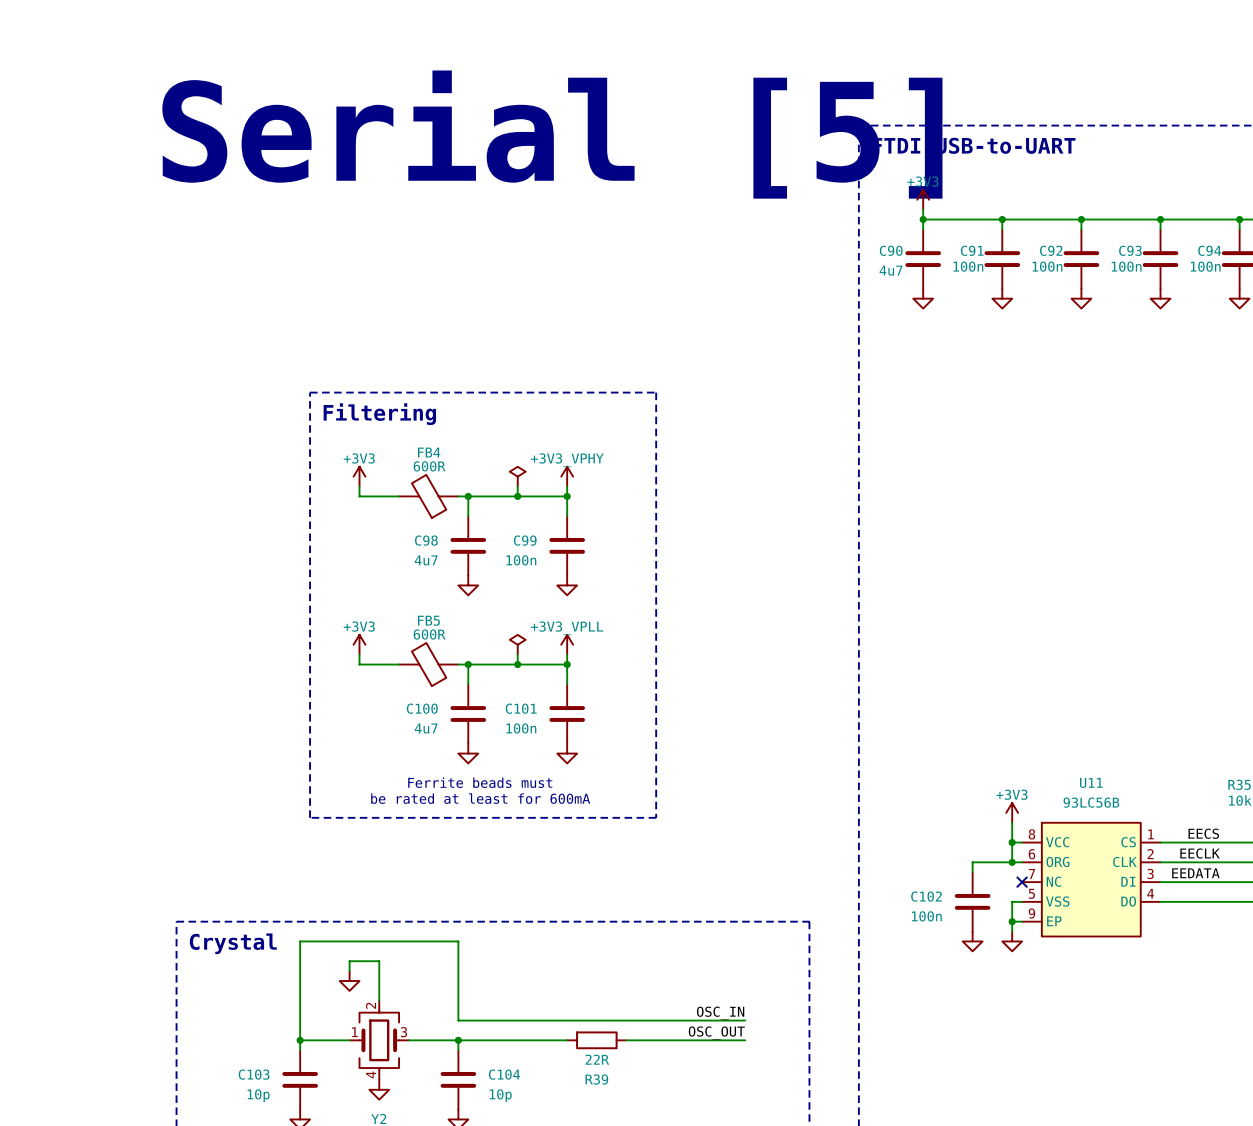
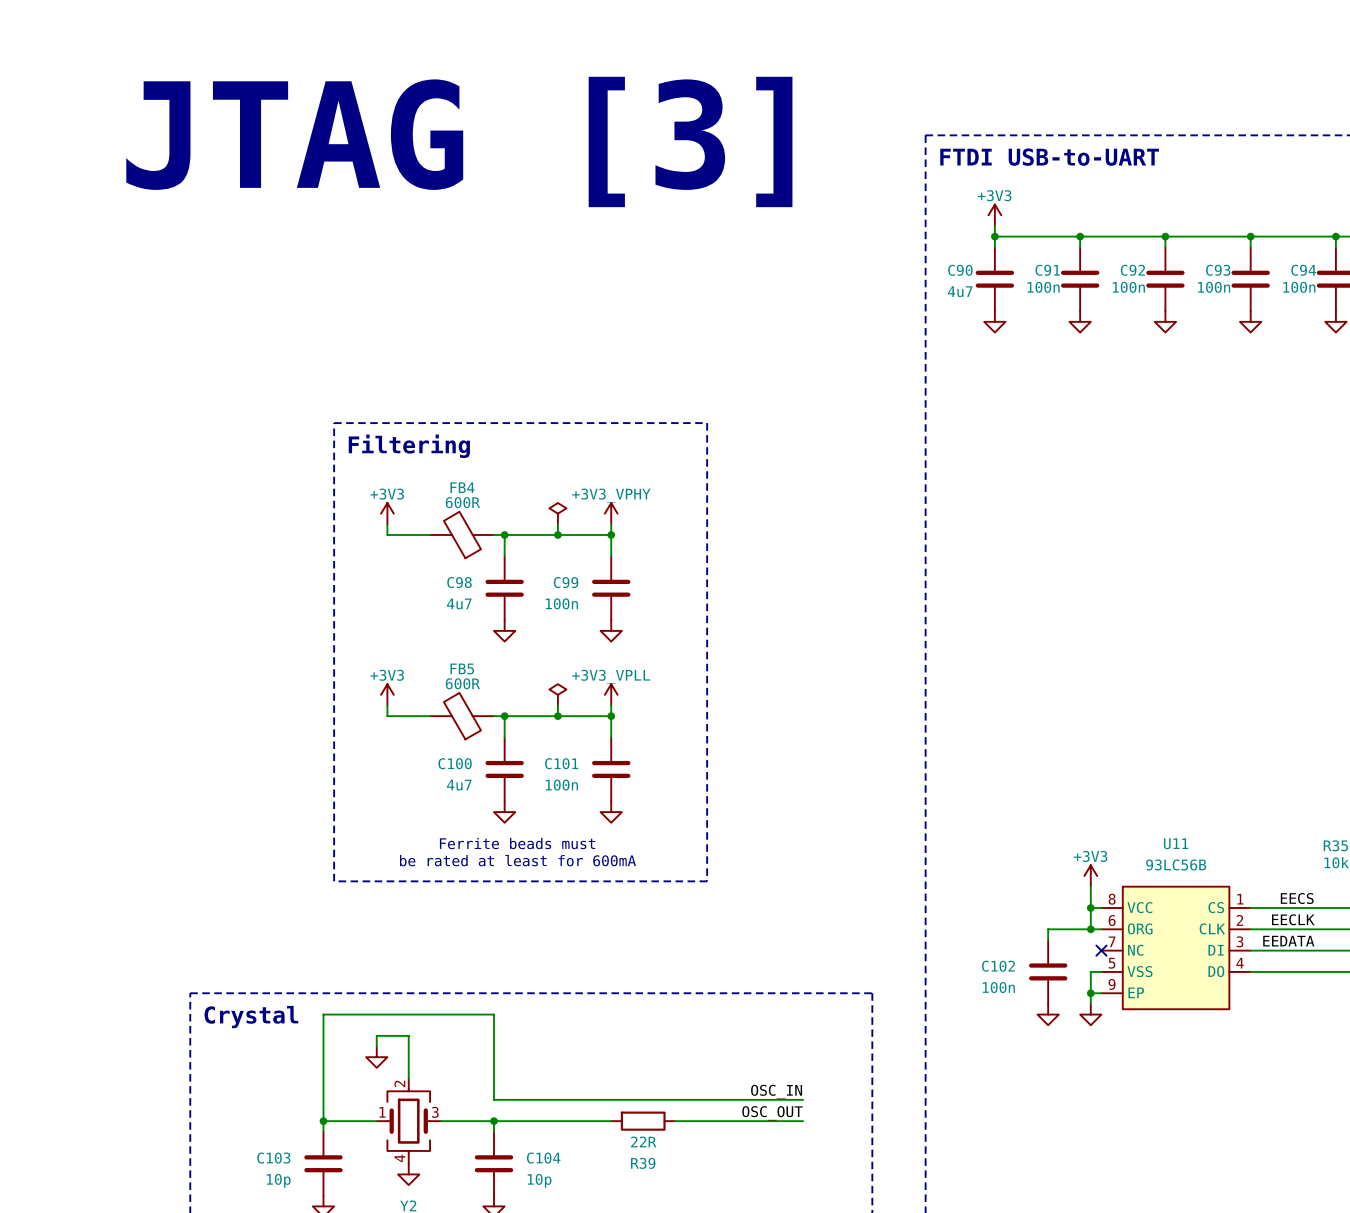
text: none -> JTAG [3] (459, 141)
text: Serial [5] (552, 134) -> none

